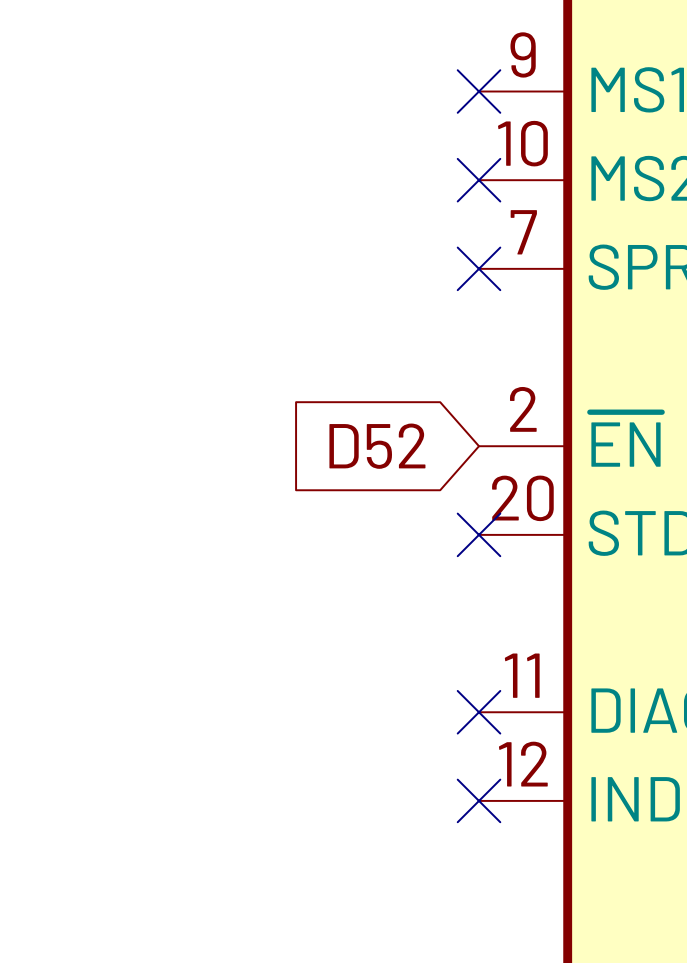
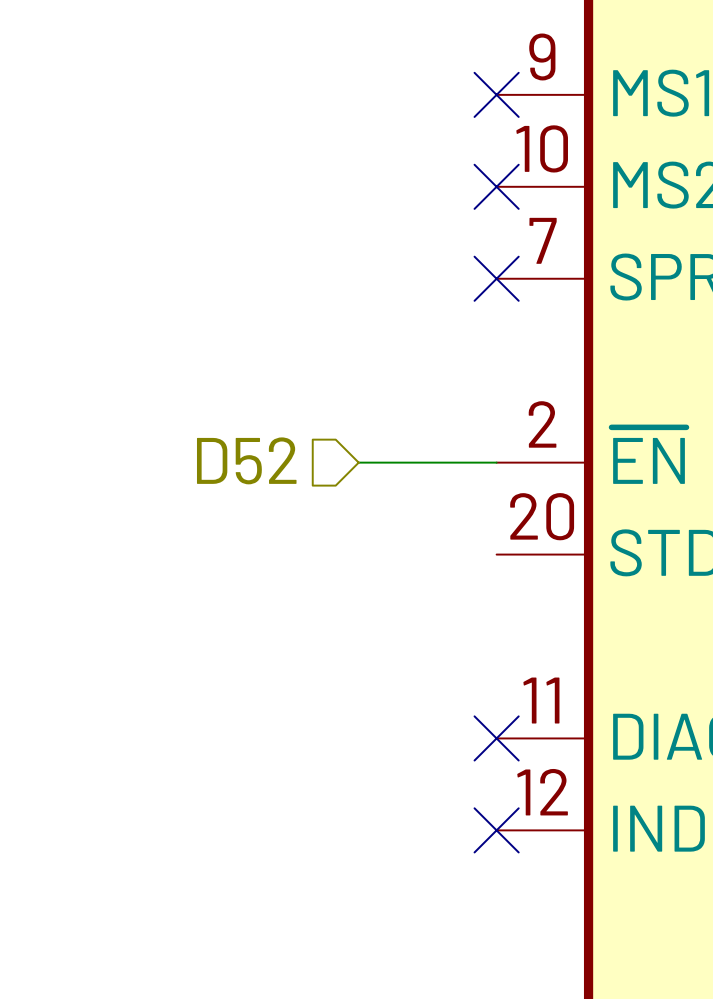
hierarchical label: none -> D52 (246, 460)
wire: none -> (358, 462) (496, 462)
global label: D52 (377, 446) -> none
no-connect mark: (479, 534) -> none

